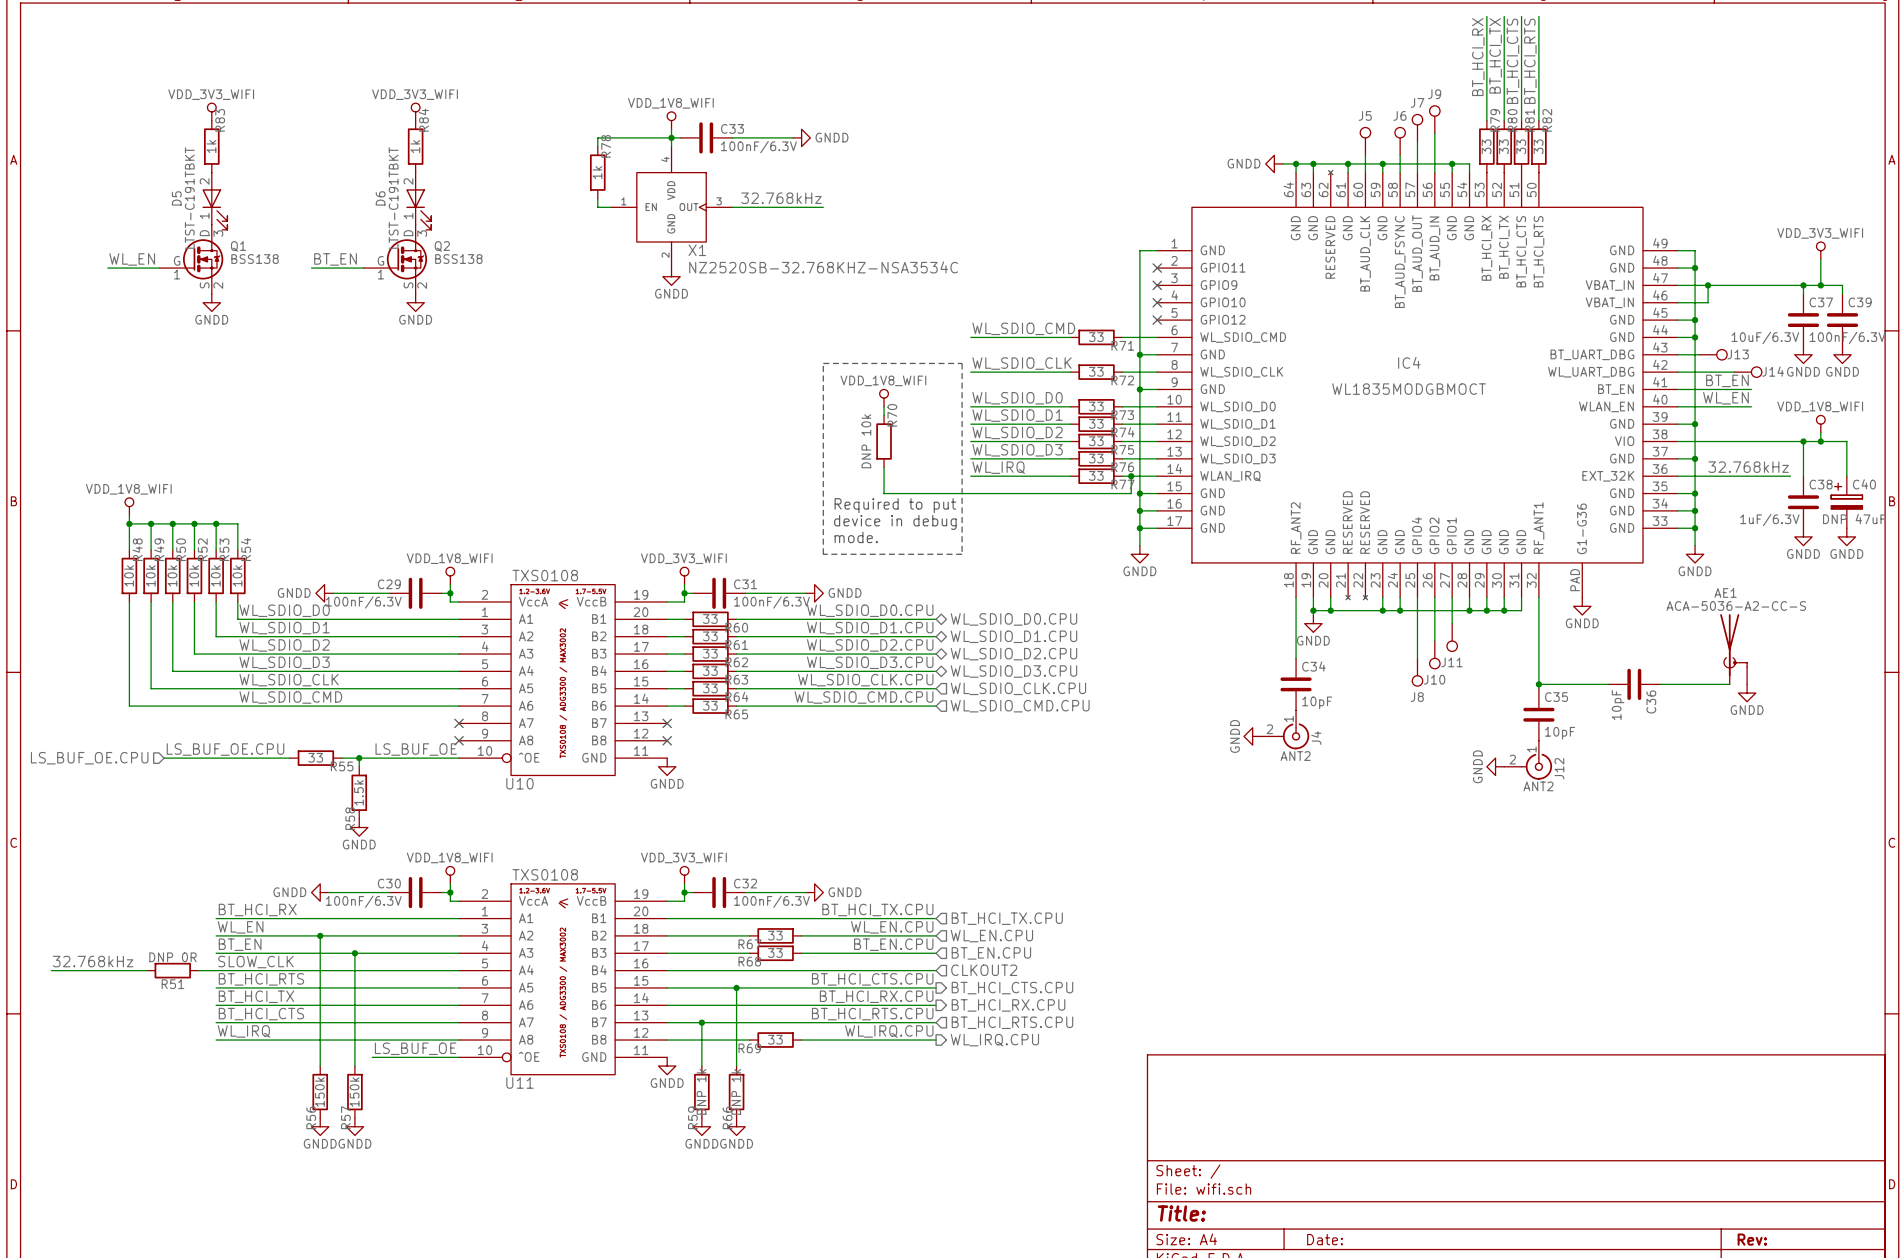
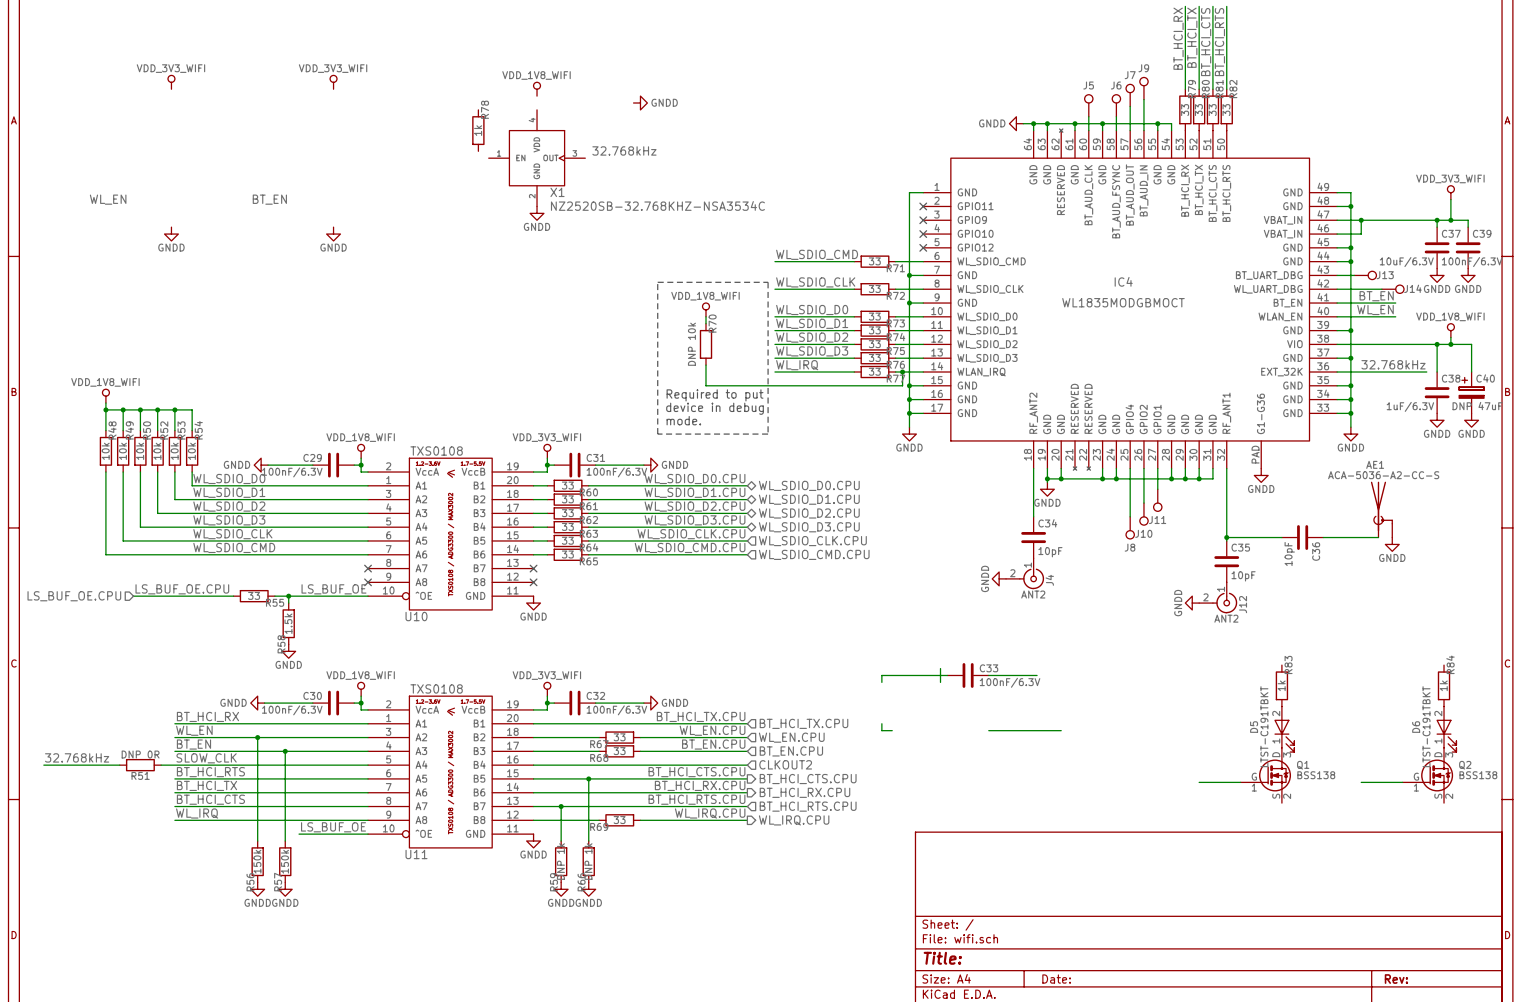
wire: (671, 129) (671, 146) -> none
junction: (671, 137) -> none
wire: (680, 137) (597, 137) (597, 146) -> none
C33 position: (706, 137) -> (968, 675)
wire: (732, 137) (792, 137) -> none
R83 position: (211, 146) -> (1281, 685)
R84 position: (415, 146) -> (1444, 685)
wire: (597, 198) (597, 207) (610, 207) -> none
D5 position: (214, 201) -> (1284, 729)
D6 position: (418, 201) -> (1446, 729)
wire: (732, 207) (823, 207) -> none
Q1 position: (191, 259) -> (1265, 775)
Q2 position: (395, 259) -> (1427, 775)
wire: (107, 268) (159, 268) -> none
wire: (311, 268) (363, 268) -> none
wire: none -> (940, 668) (940, 682)
wire: none -> (947, 675) (881, 675) (881, 682)
wire: none -> (988, 675) (1037, 675)
wire: none -> (881, 723) (881, 730) (892, 730)
wire: none -> (988, 730) (1061, 730)
wire: none -> (1199, 782) (1240, 782)
wire: none -> (1361, 782) (1402, 782)

